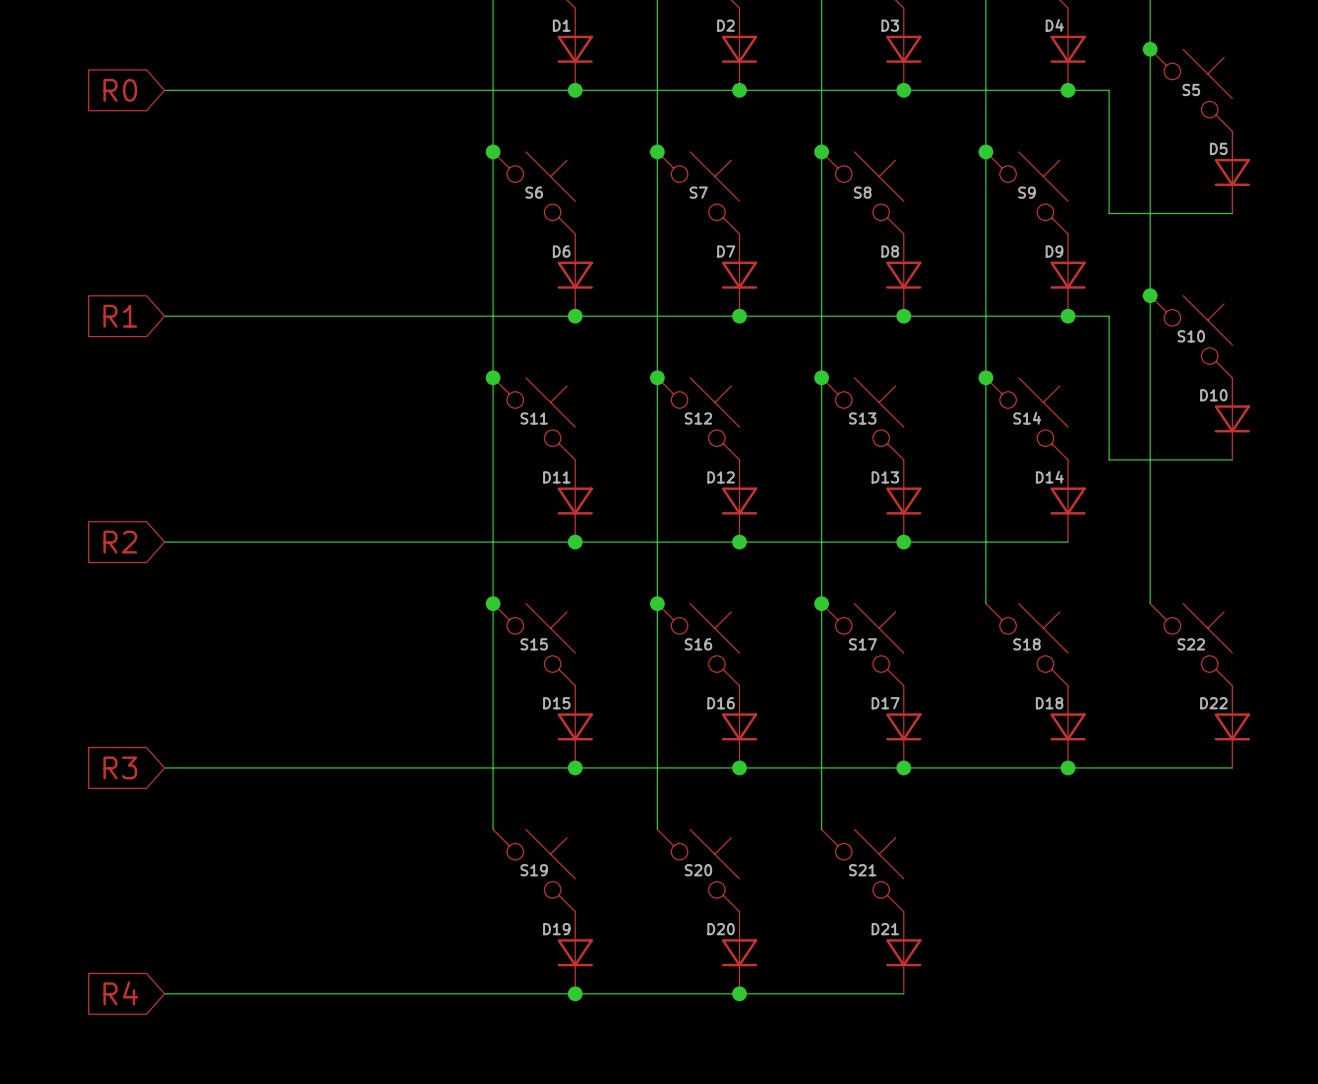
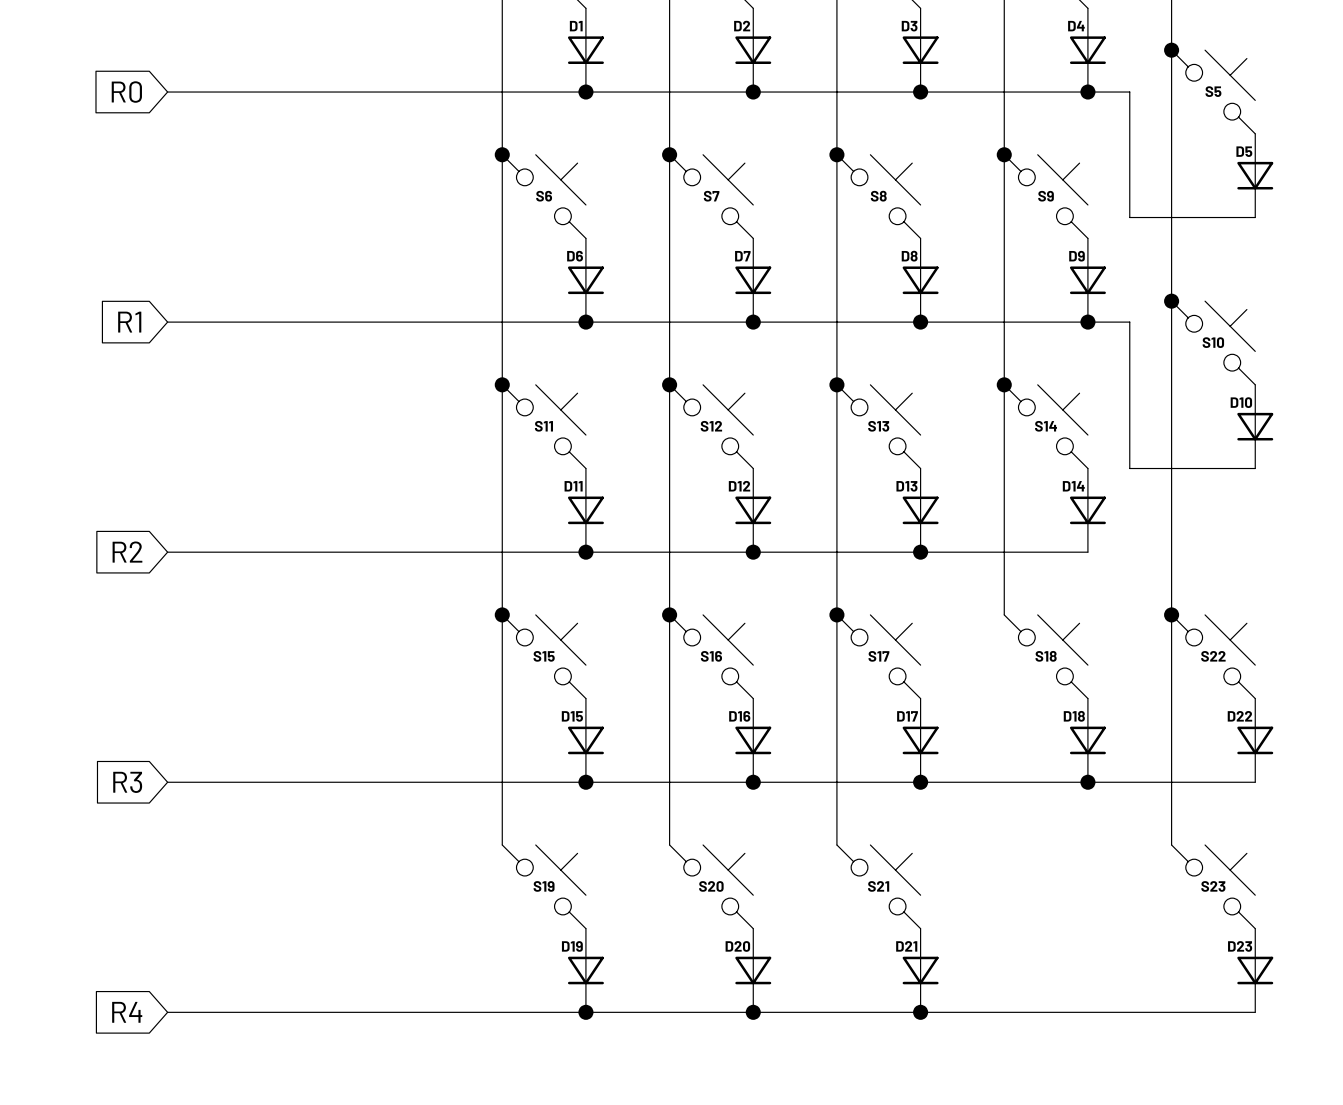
wire: none -> (1171, 614) (1171, 845)
junction: none -> (1171, 614)
S23: none -> (1213, 886)
D23: none -> (1255, 970)
wire: none -> (920, 1012) (1255, 1012)
junction: none -> (920, 1012)

